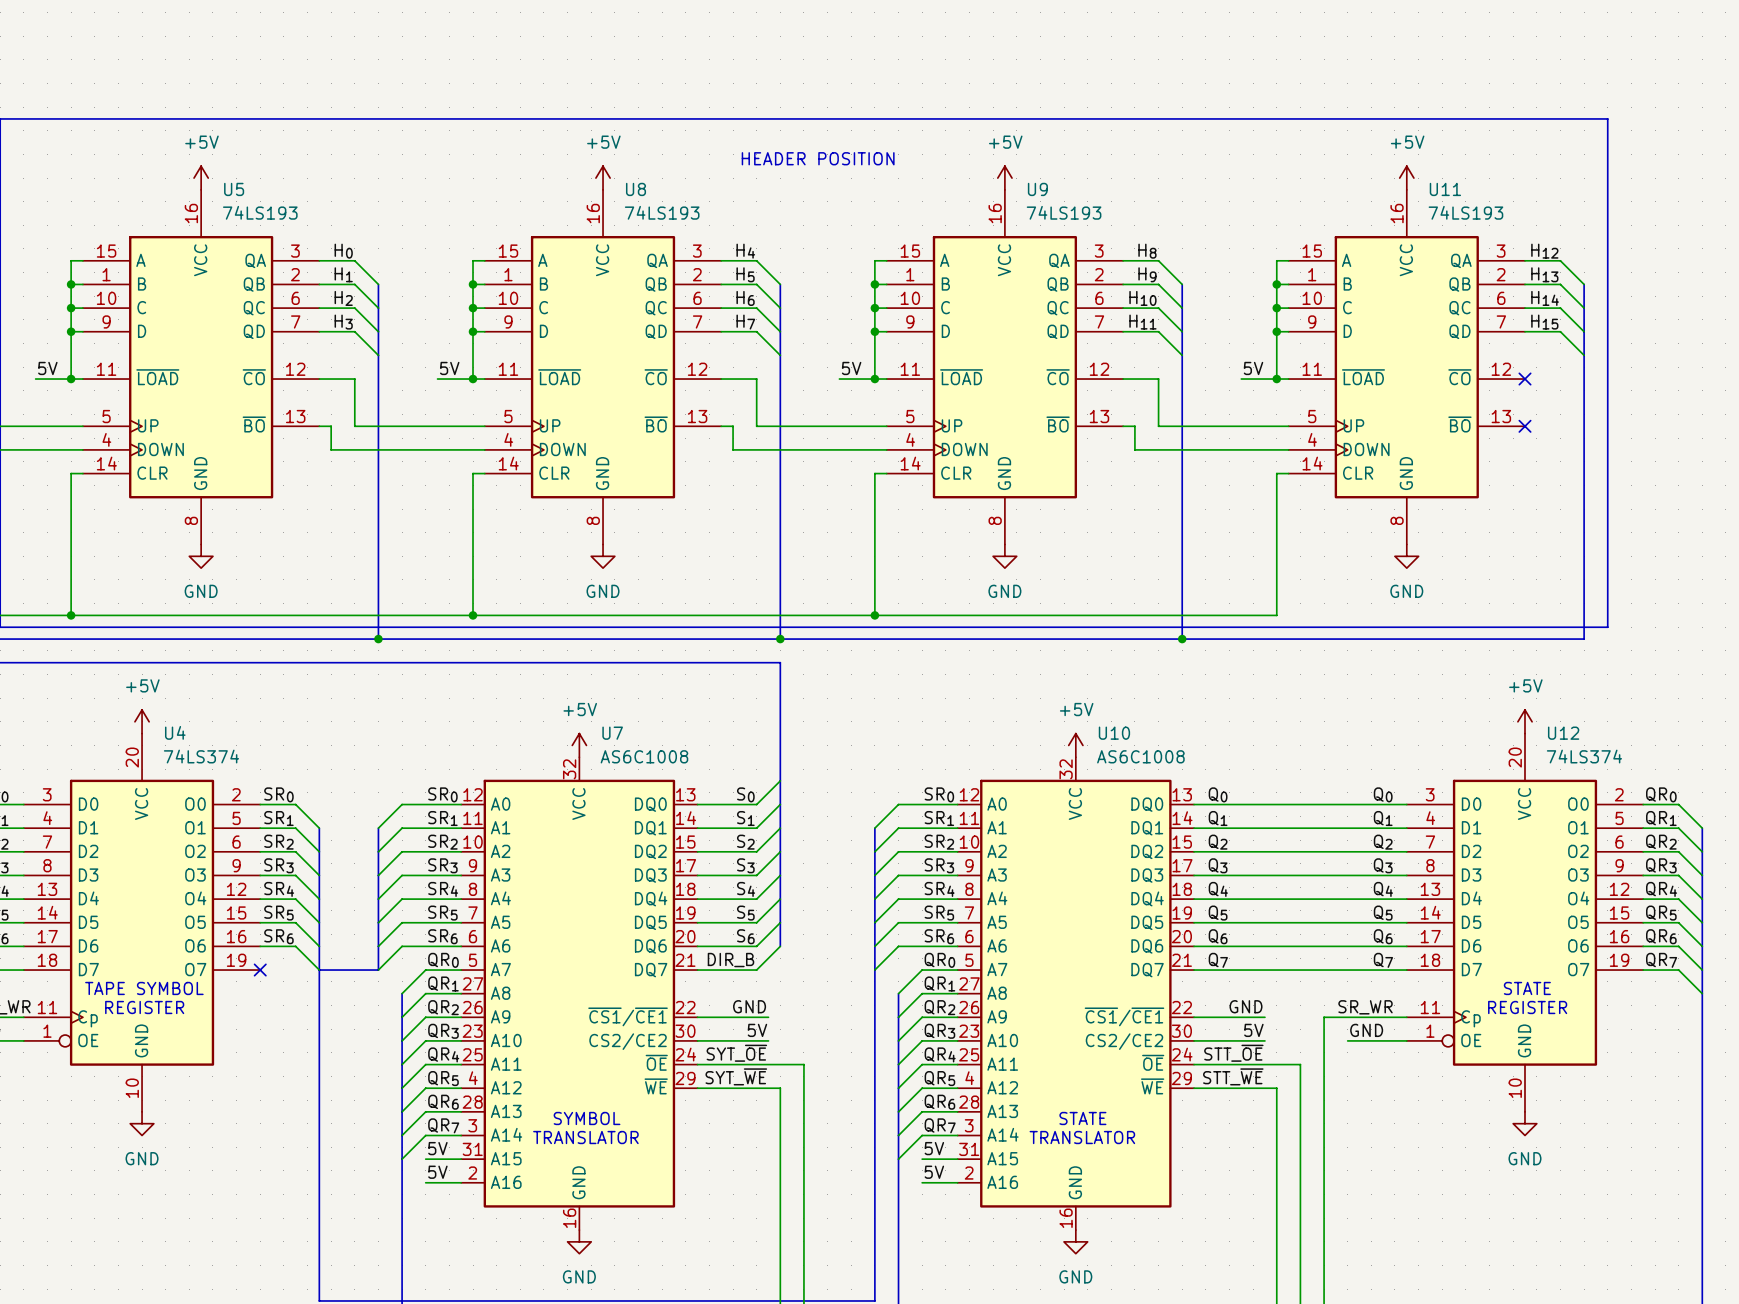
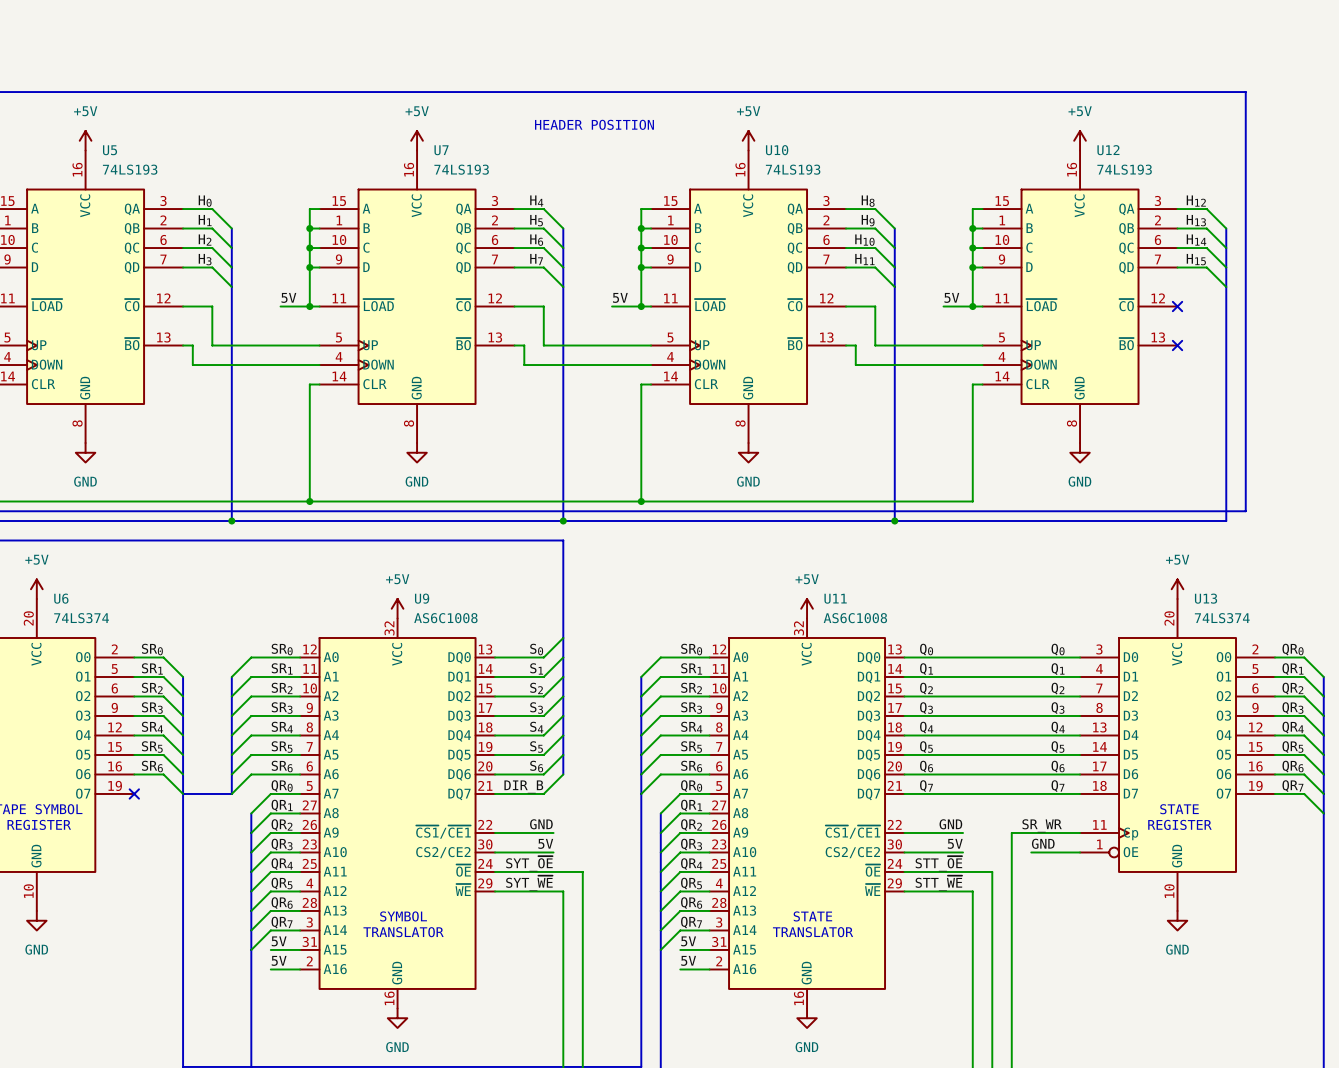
U8 name: U8 (636, 189) -> U7 (441, 150)
U9 name: U9 (1037, 189) -> U10 (777, 150)
U11 name: U11 (1445, 189) -> U12 (1108, 150)
U4 name: U4 (175, 732) -> U6 (61, 598)
U7 name: U7 (612, 733) -> U9 (422, 598)
U10 name: U10 (1114, 733) -> U11 (835, 598)
U12 name: U12 (1563, 733) -> U13 (1206, 598)

